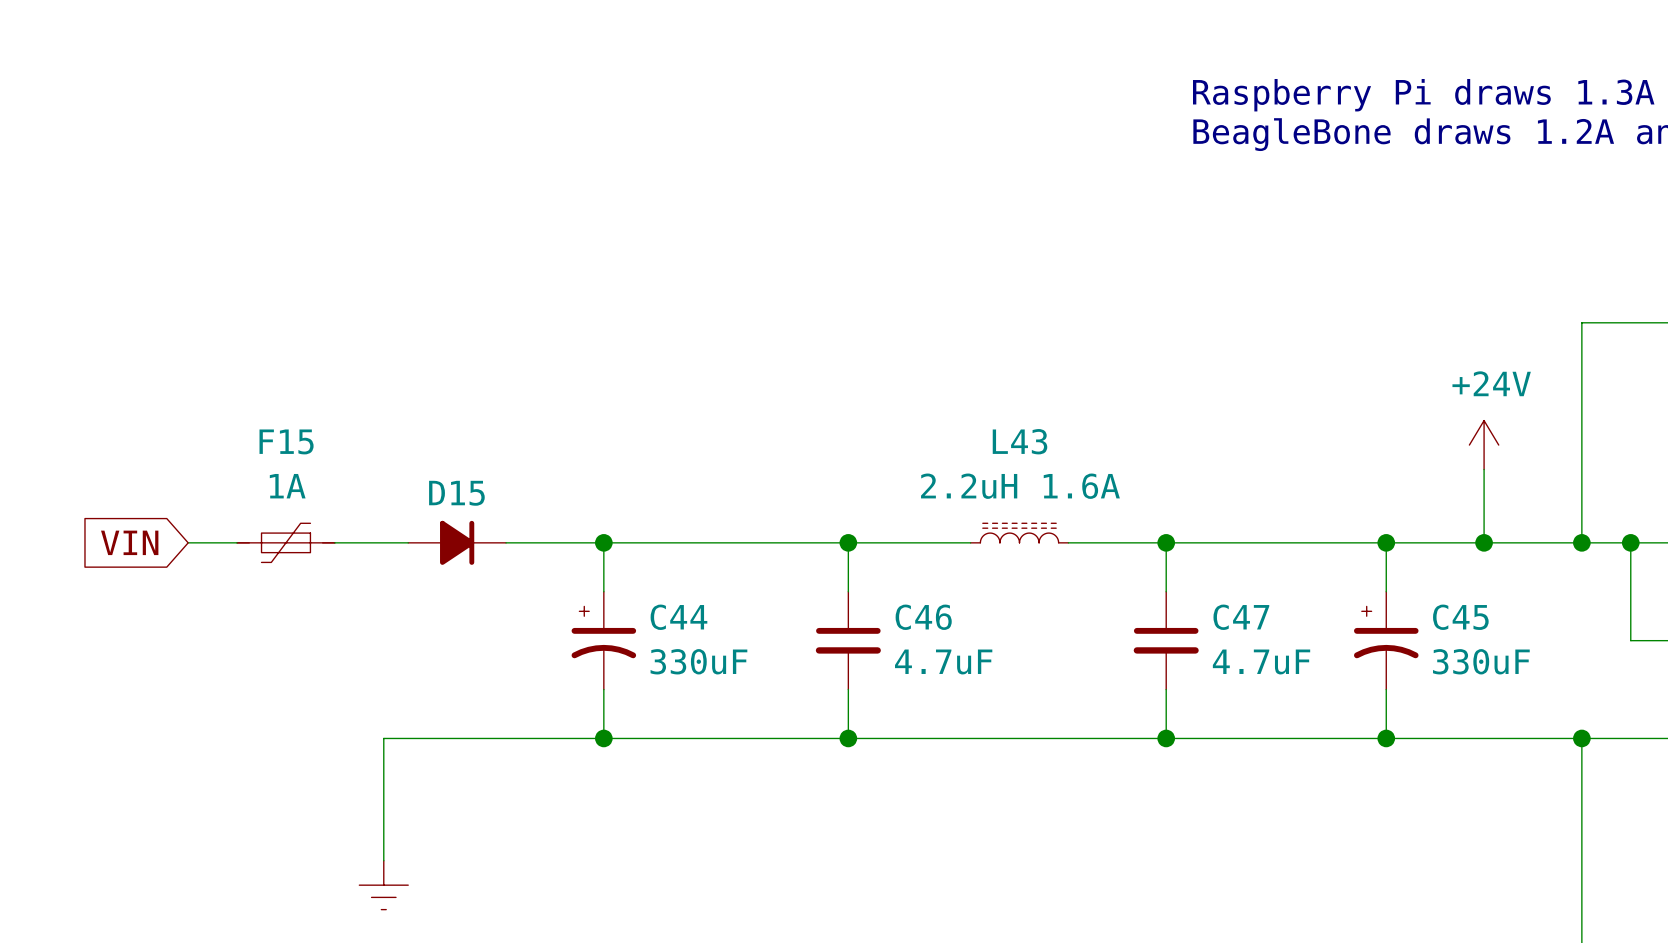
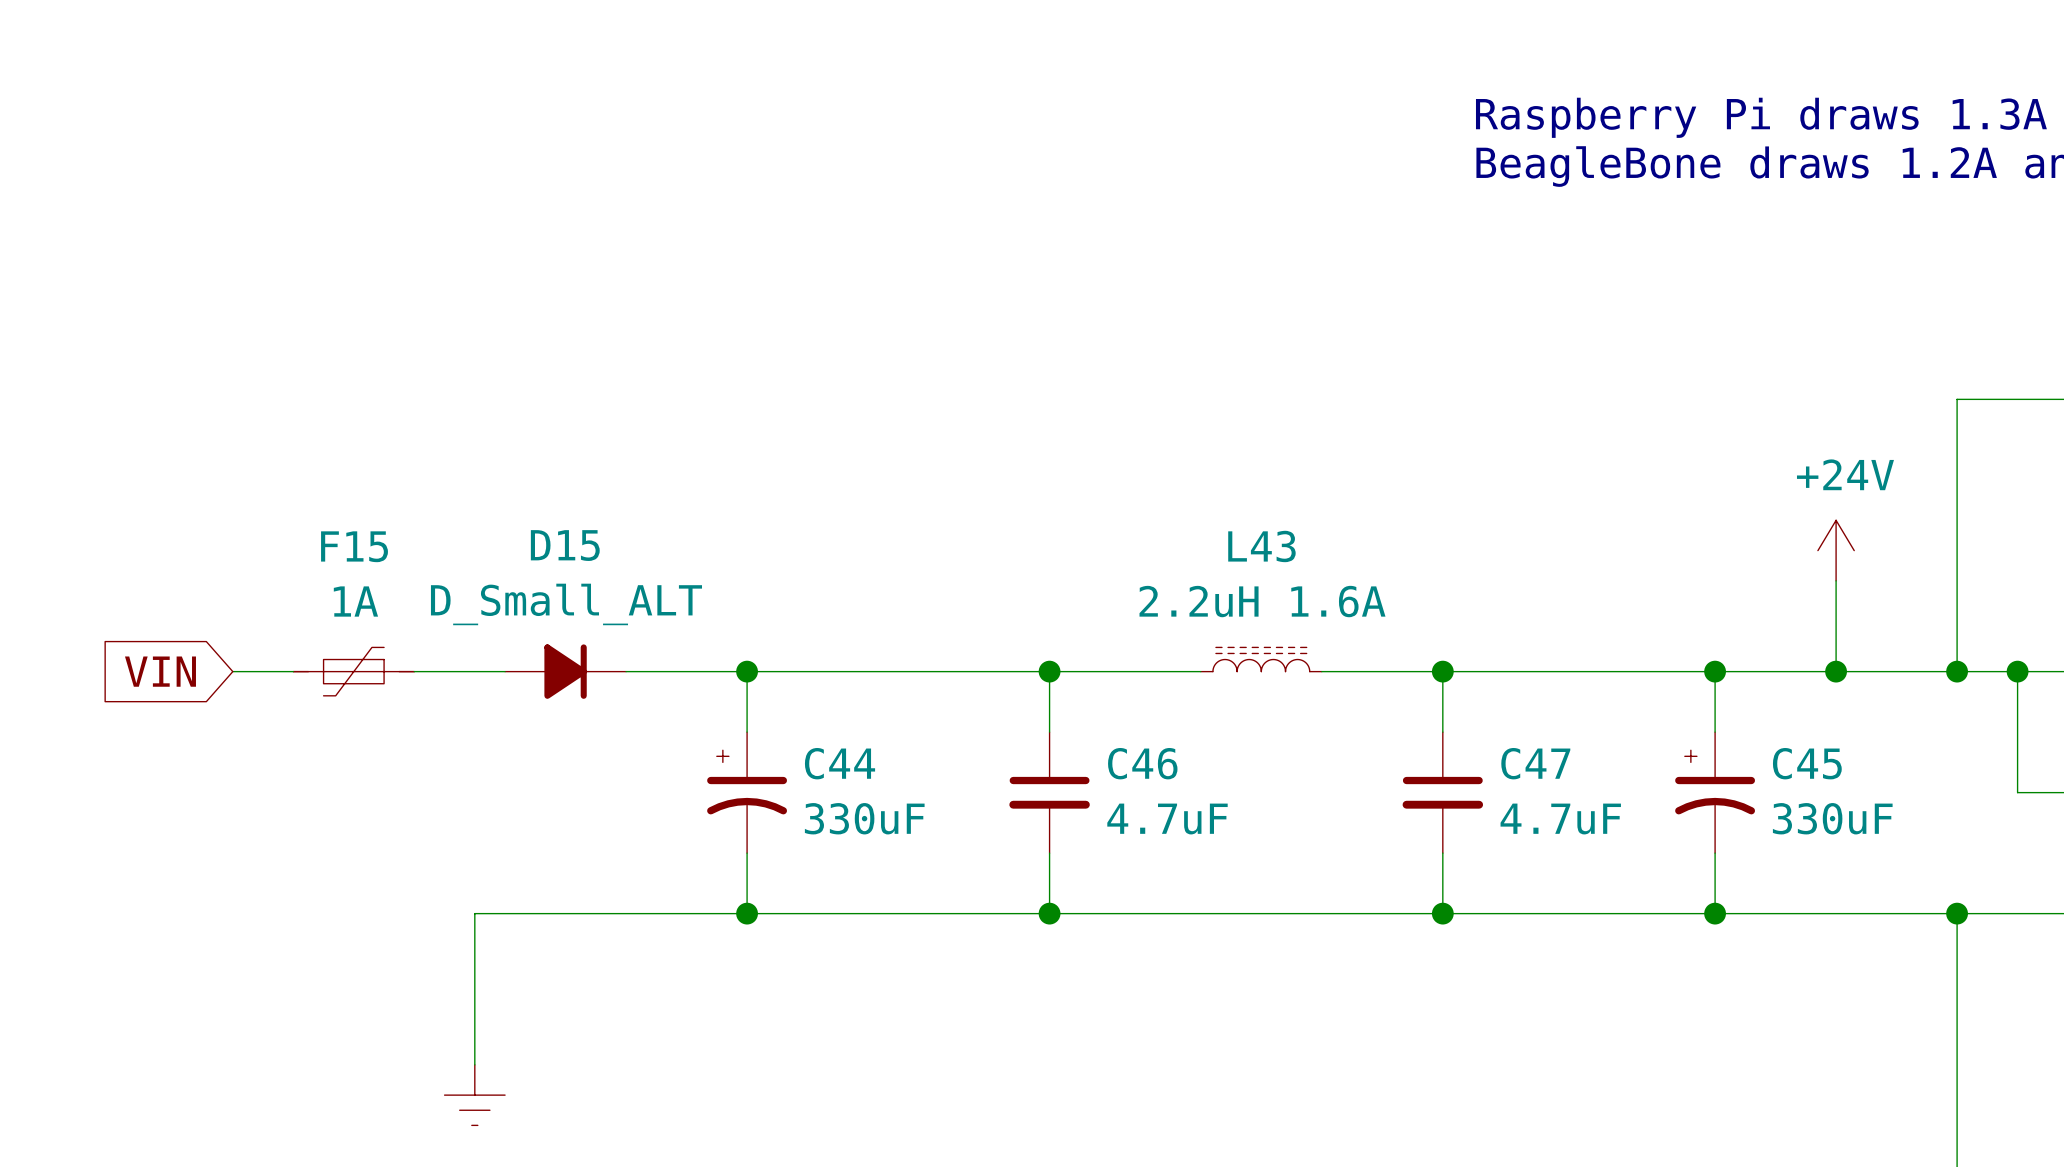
D15 value: none -> D_Small_ALT (566, 604)
D15 name position: D15 (456, 493) -> D15 (565, 545)

